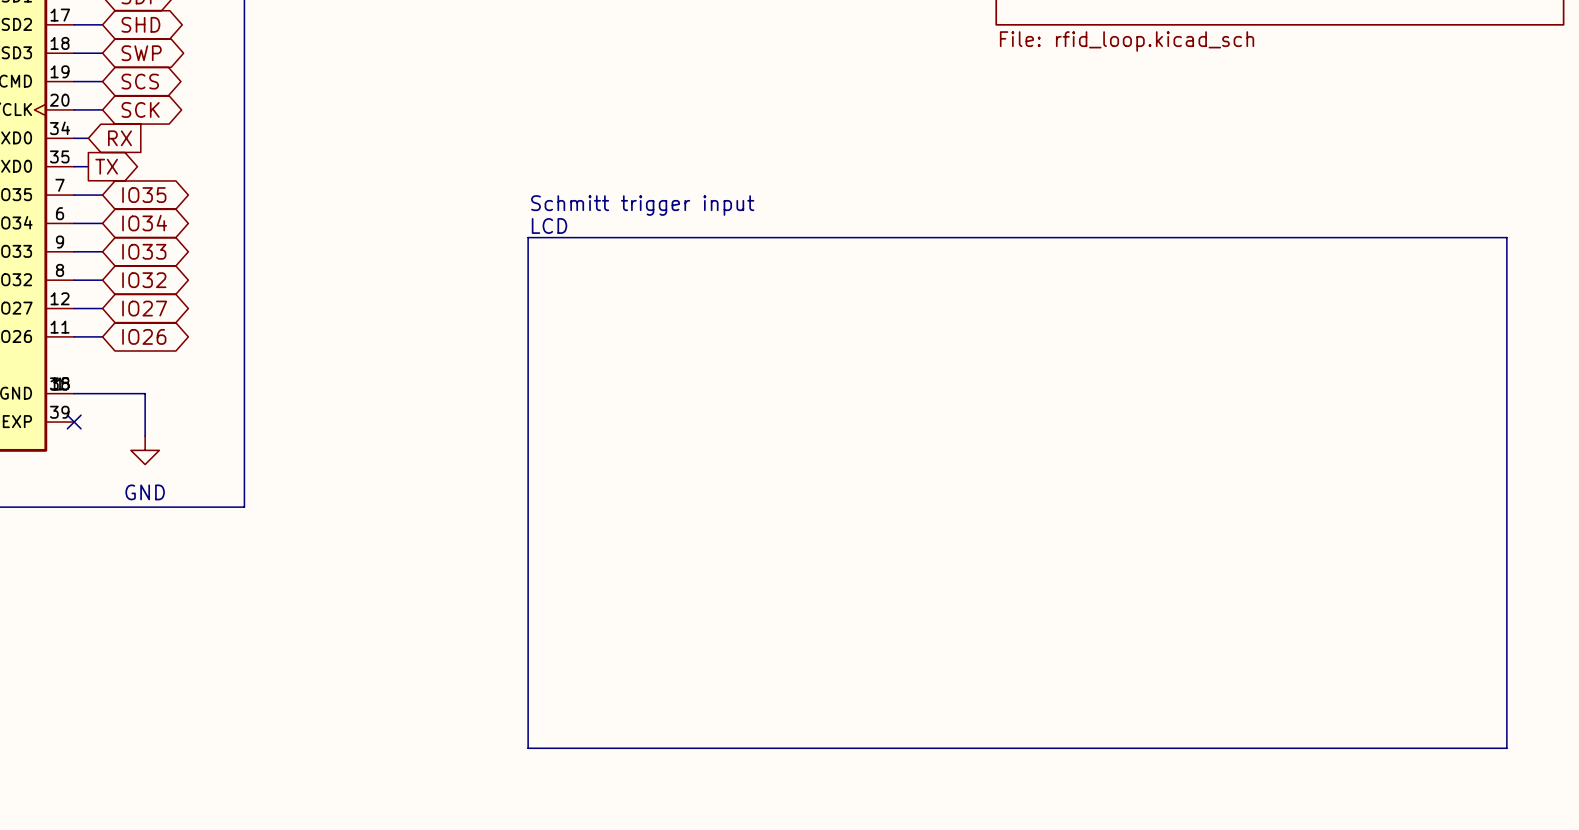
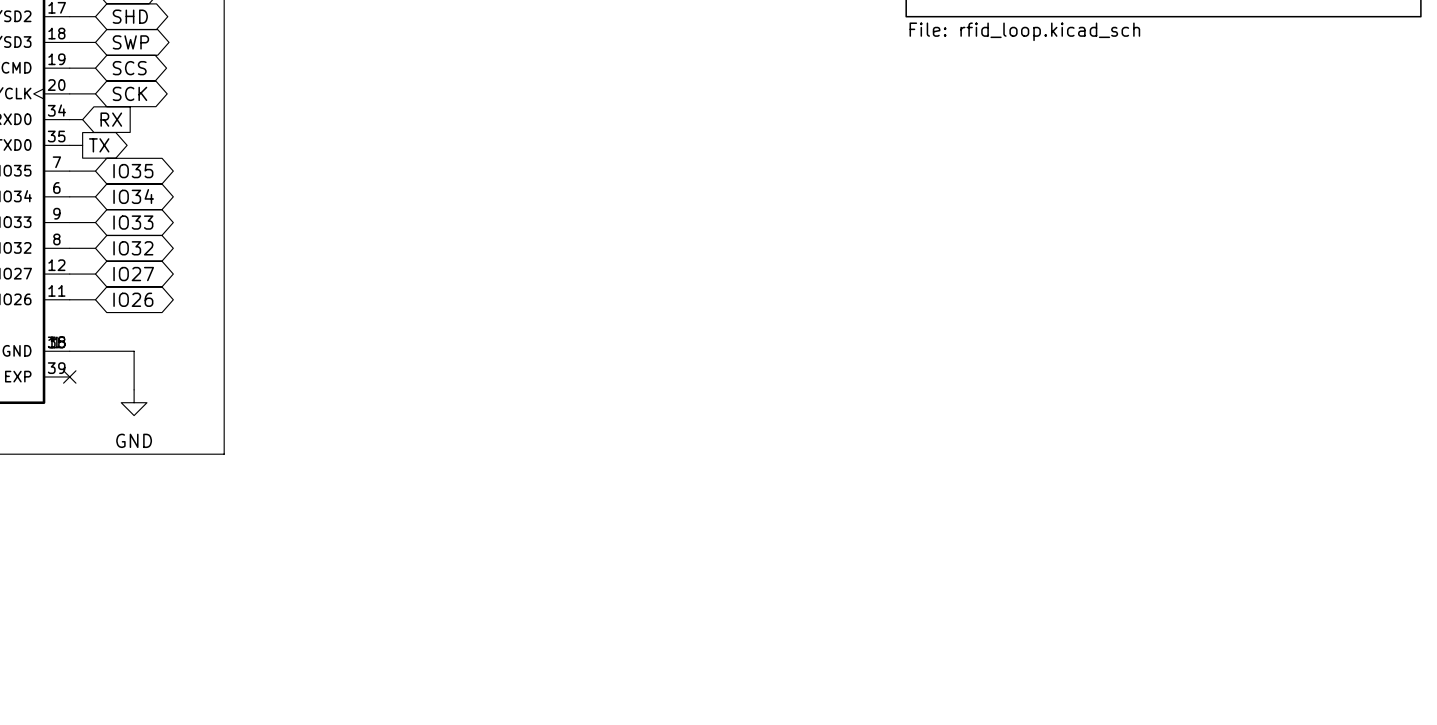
text: Schmitt trigger input (642, 205) -> none
text: LCD (549, 225) -> none
line: (528, 237) (1506, 237) (1506, 748) (528, 748) (528, 237) -> none

